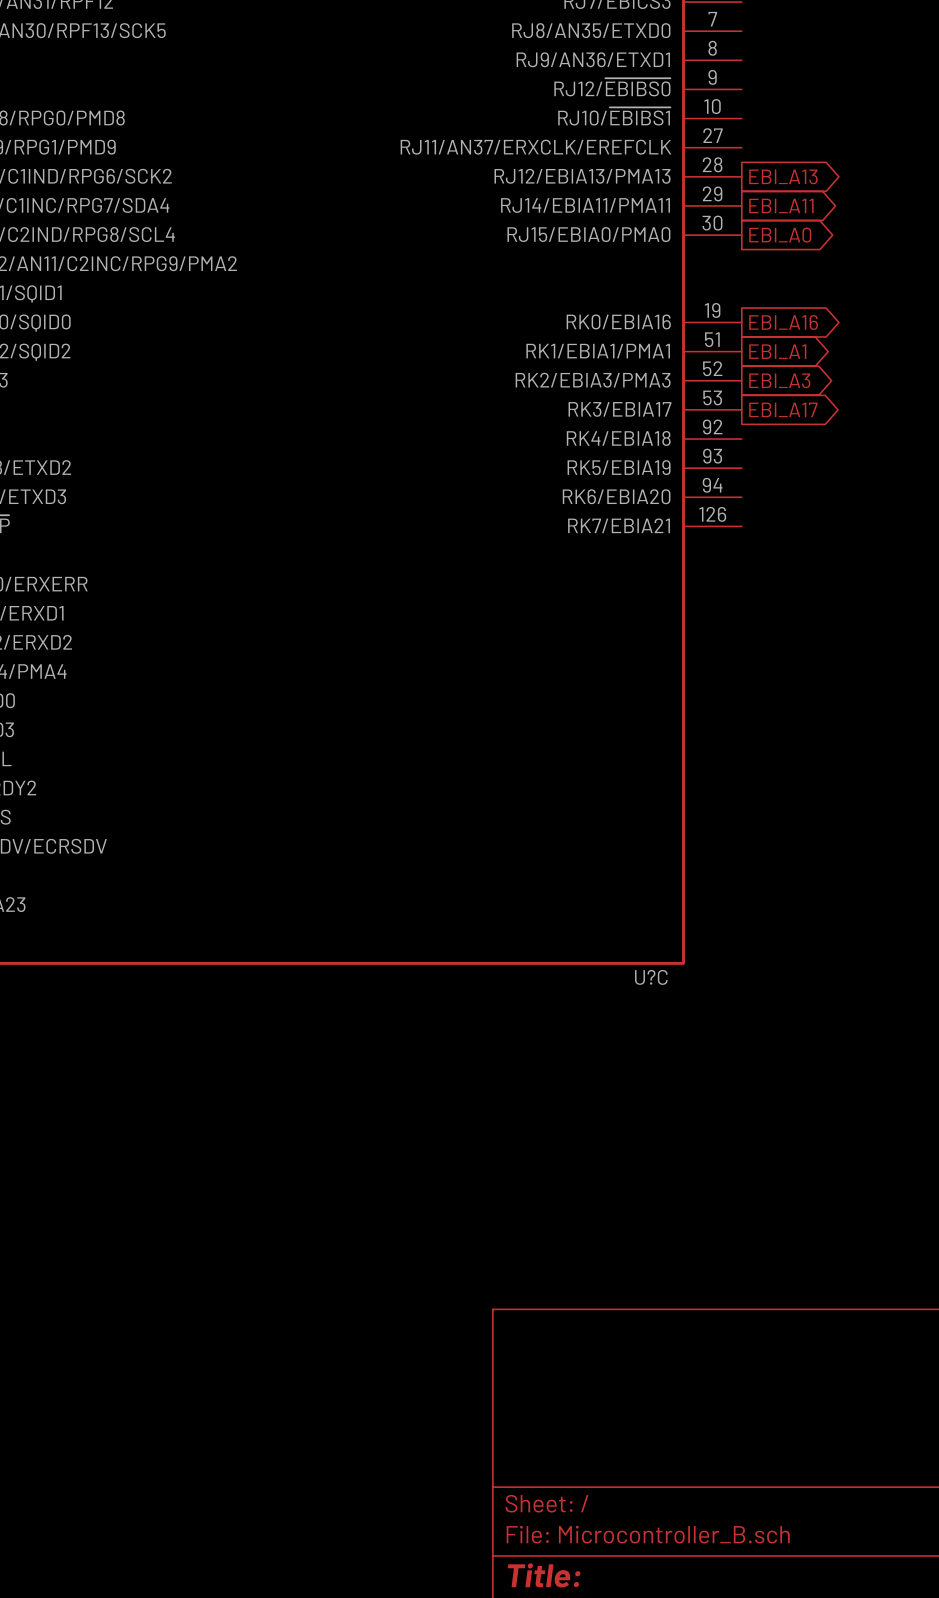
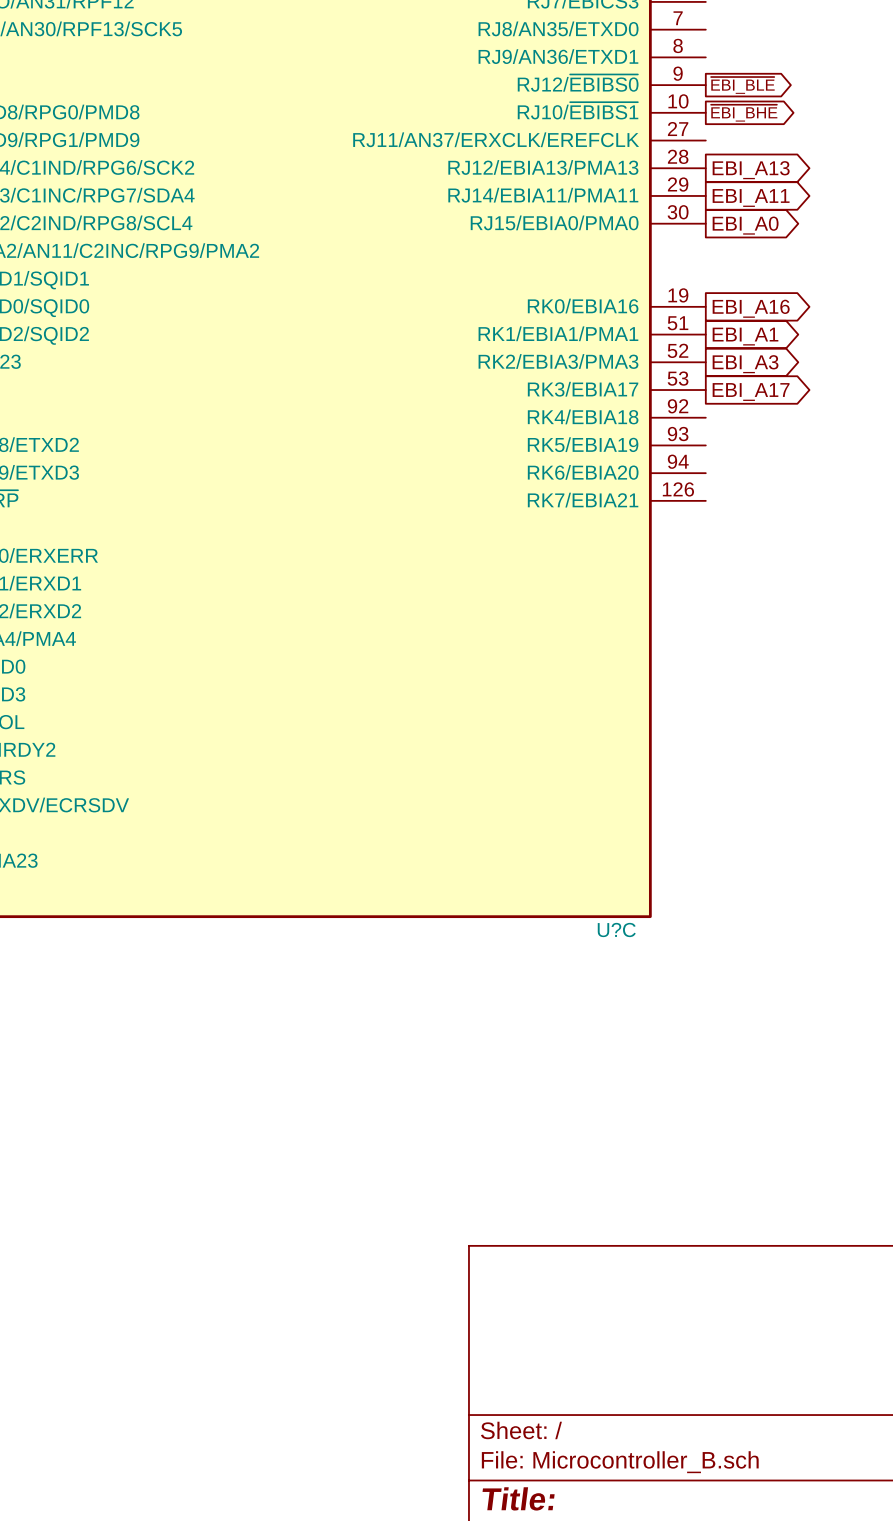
global label: none -> ~{EBI_BLE} (742, 85)
global label: none -> ~{EBI_BHE} (744, 113)

